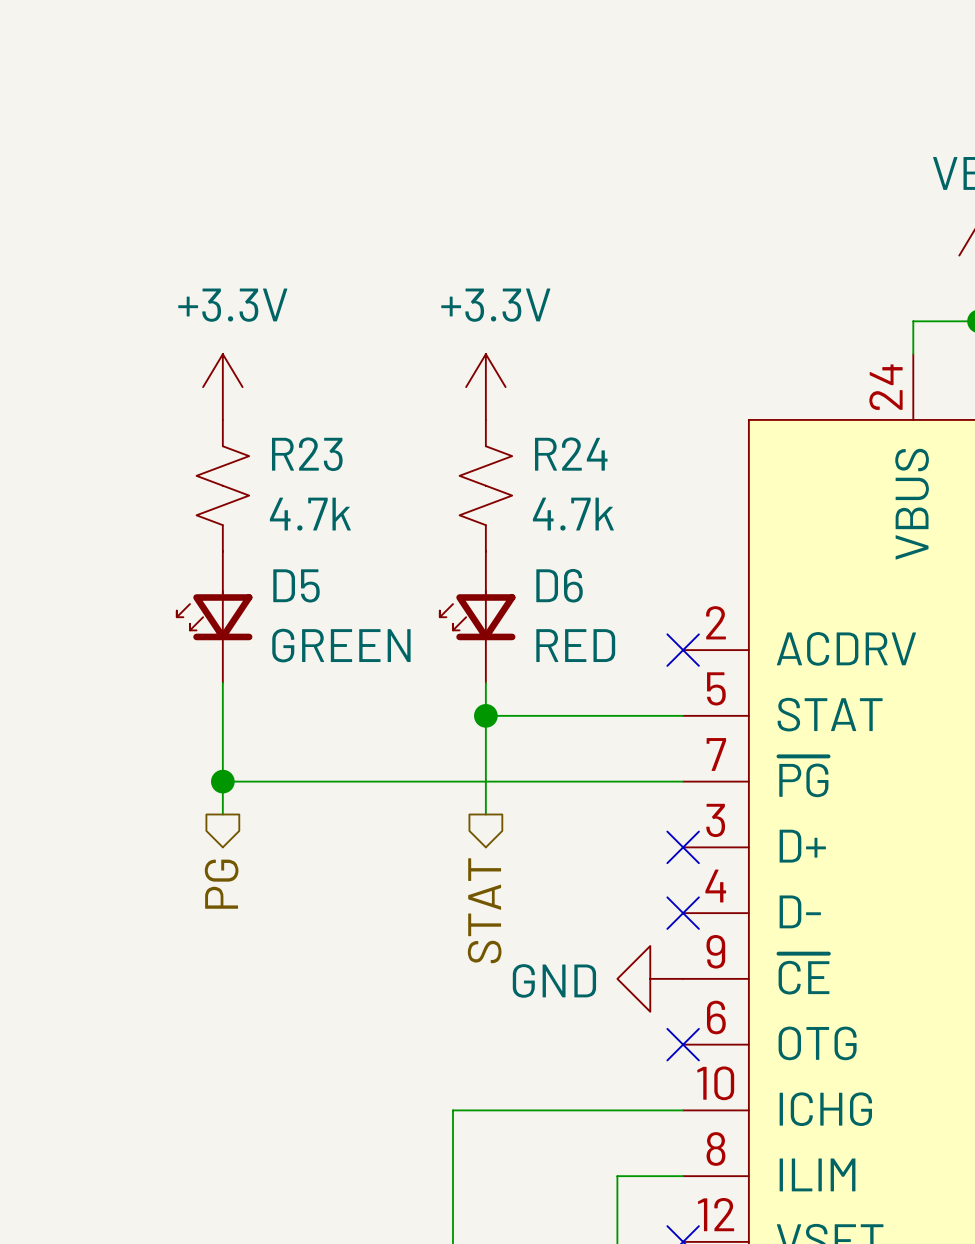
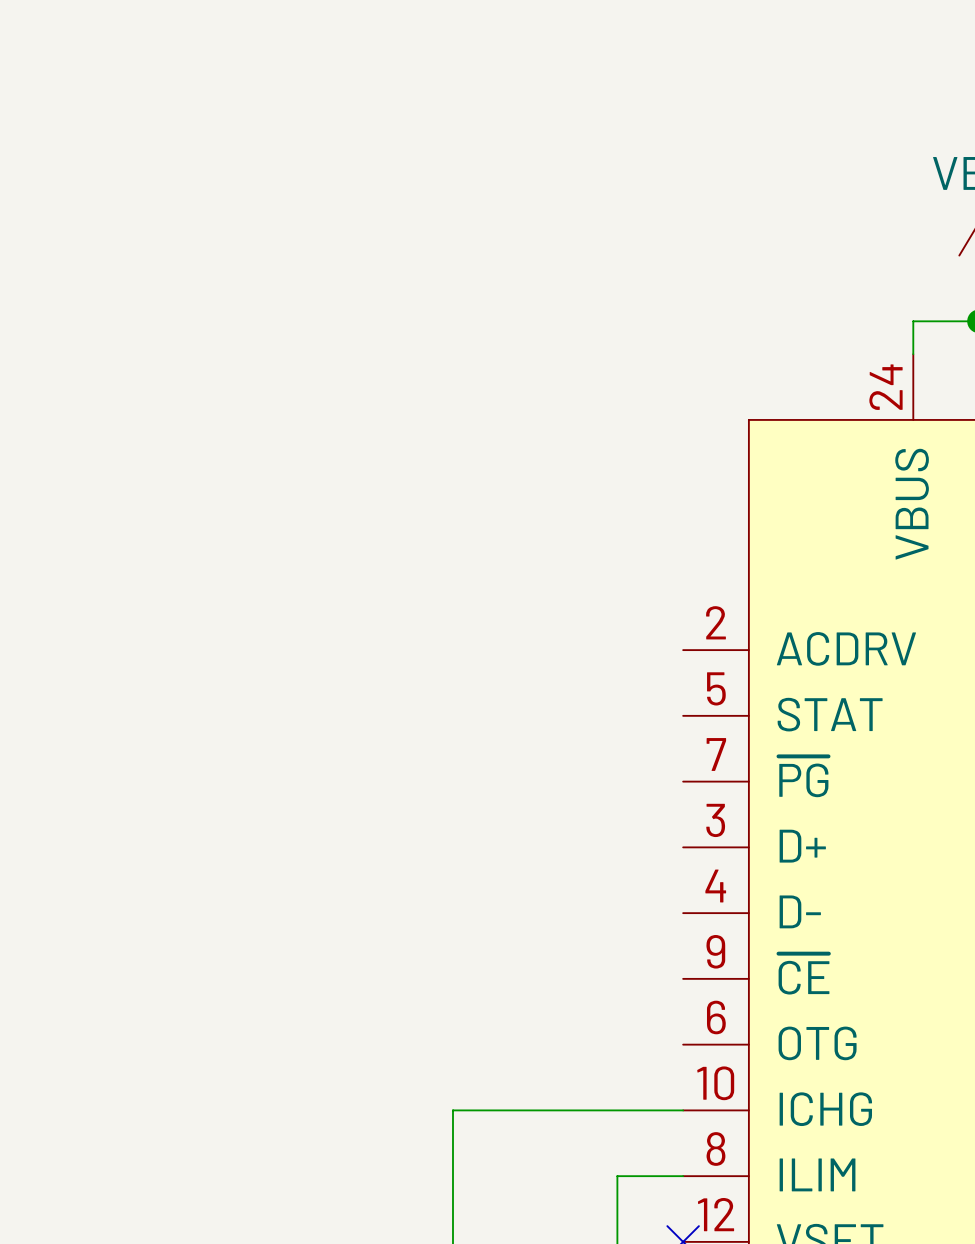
power symbol: +3.3V (222, 387) -> none
power symbol: +3.3V (485, 387) -> none
R23: 4.7k (222, 485) -> none
R24: 4.7k (485, 485) -> none
D5: GREEN (214, 617) -> none
D6: RED (477, 617) -> none
no-connect mark: (683, 650) -> none
wire: (222, 682) (222, 814) -> none
wire: (485, 682) (485, 814) -> none
wire: (485, 715) (683, 715) -> none
junction: (485, 715) -> none
wire: (222, 781) (683, 781) -> none
junction: (222, 781) -> none
no-connect mark: (683, 847) -> none
hierarchical label: PG (221, 884) -> none
hierarchical label: STAT (484, 910) -> none
no-connect mark: (683, 913) -> none
power symbol: GND (650, 978) -> none
no-connect mark: (683, 1044) -> none

